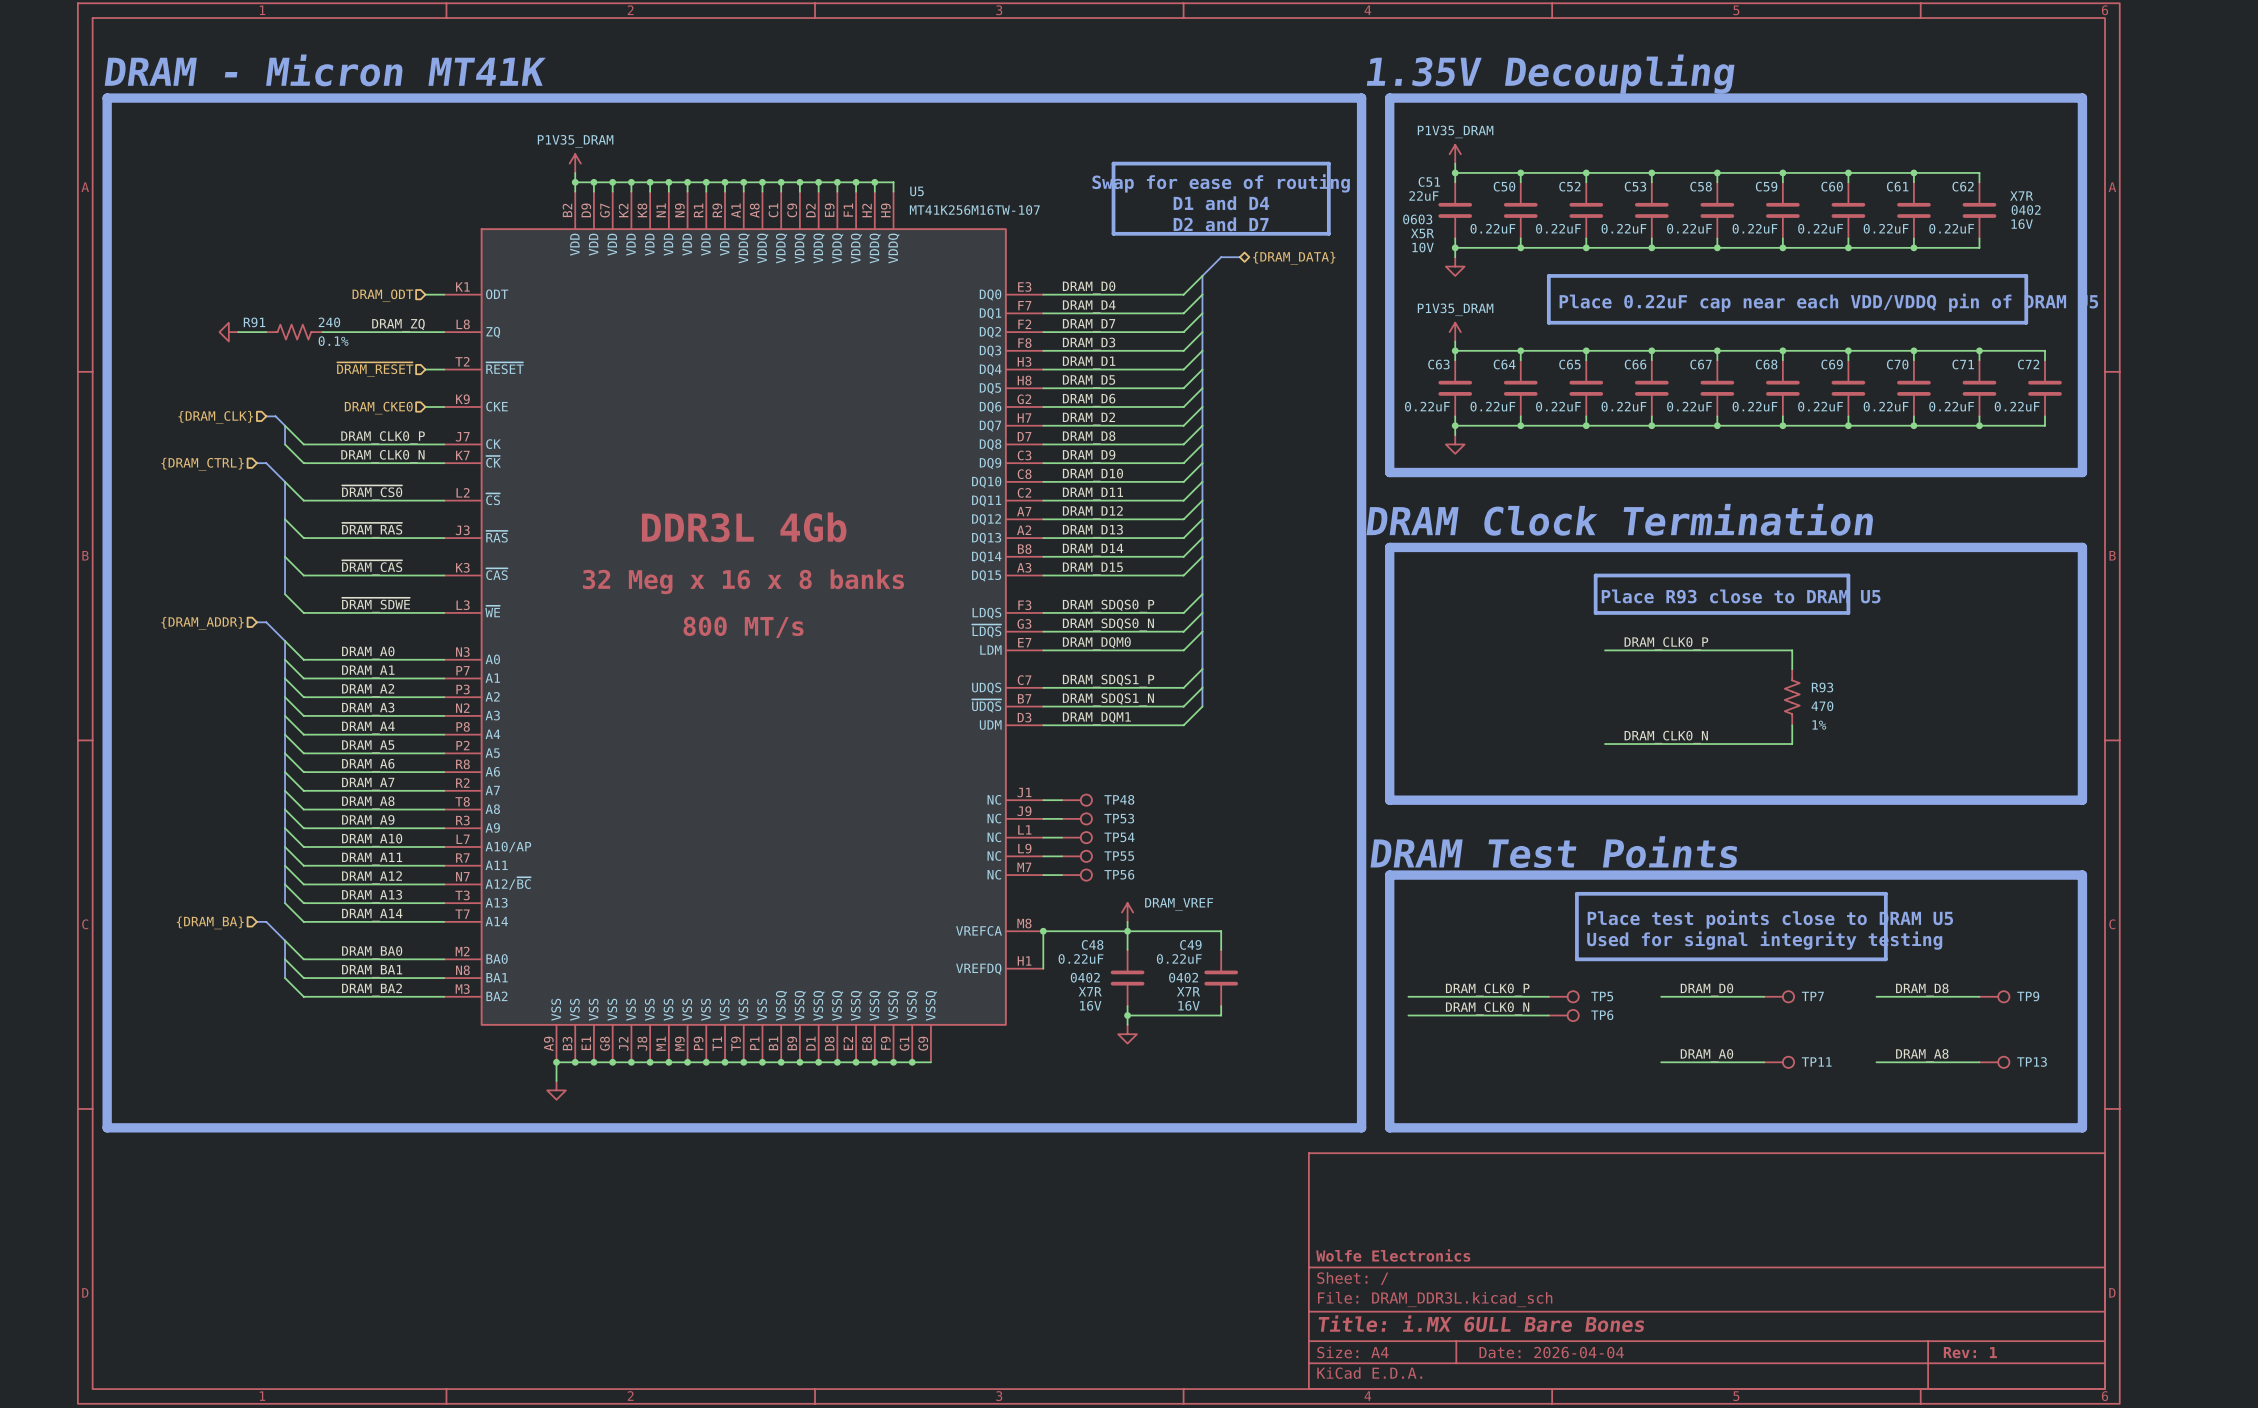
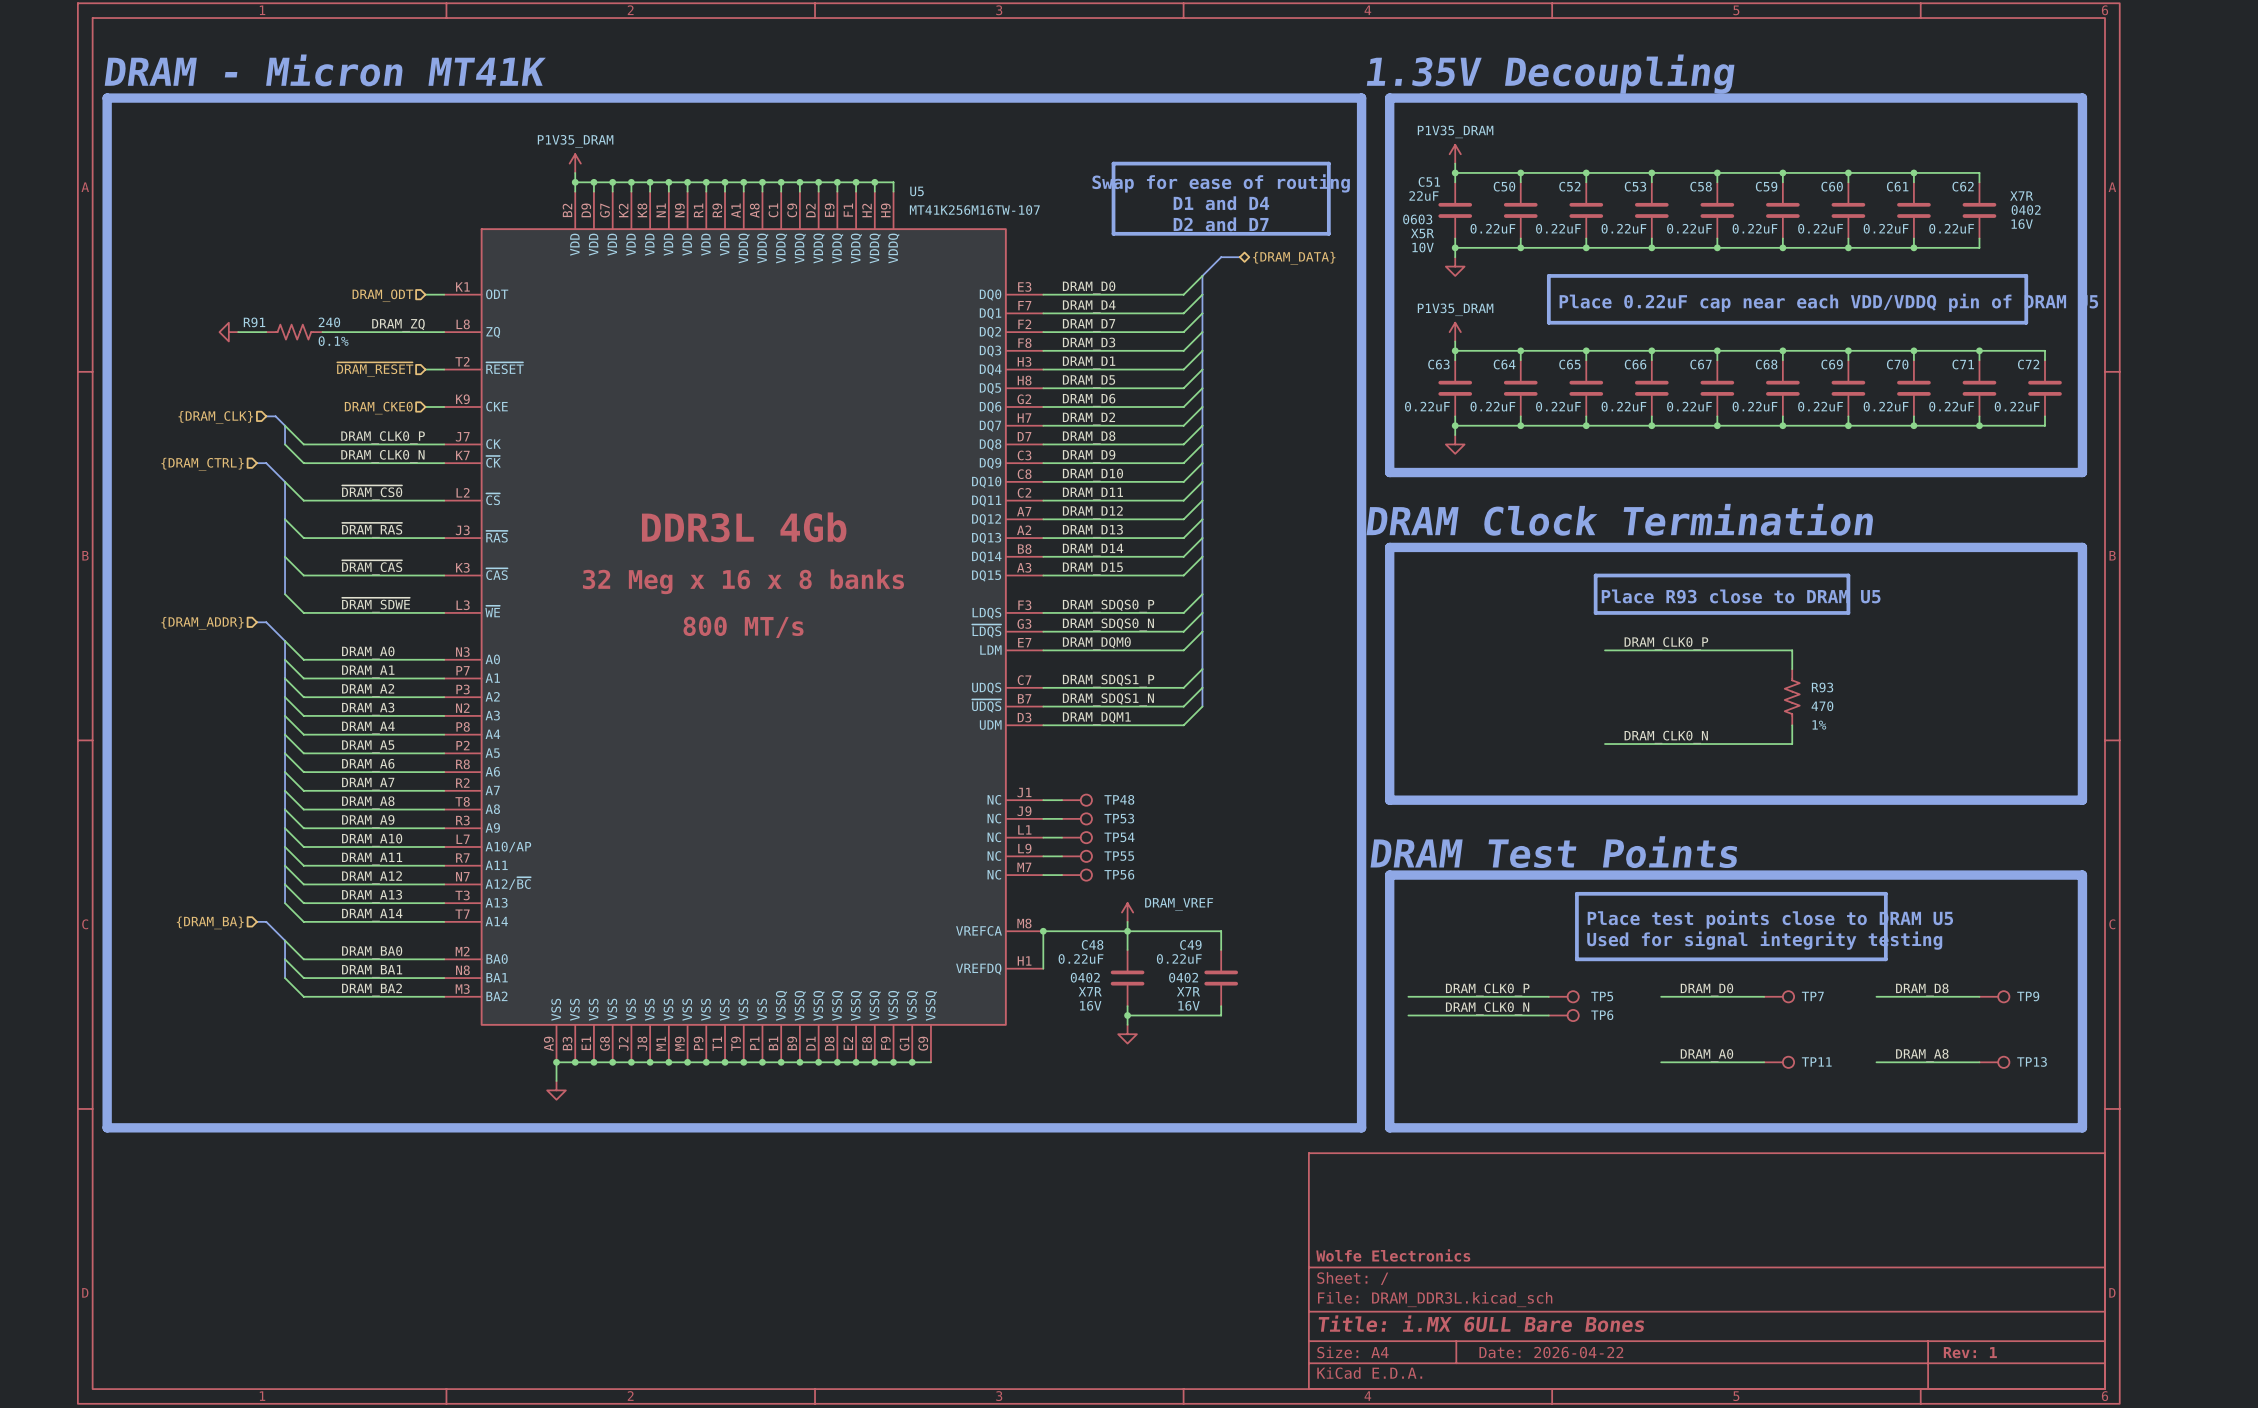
title block: Date: 2026-04-04 (1551, 1352) -> Date: 2026-04-22 (1551, 1352)

